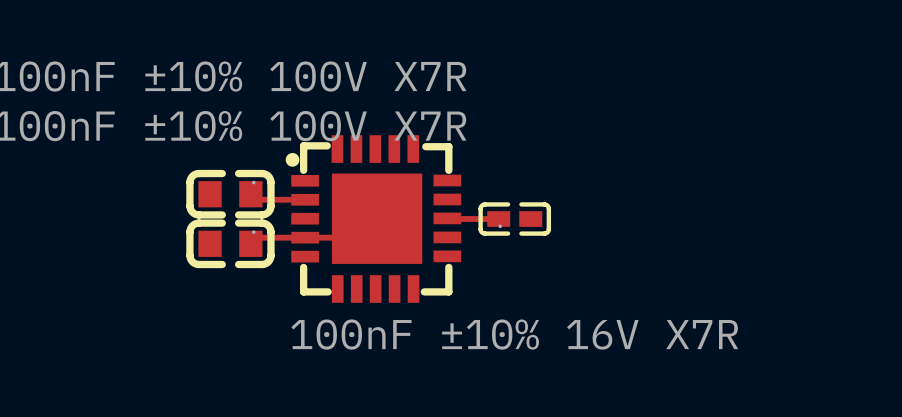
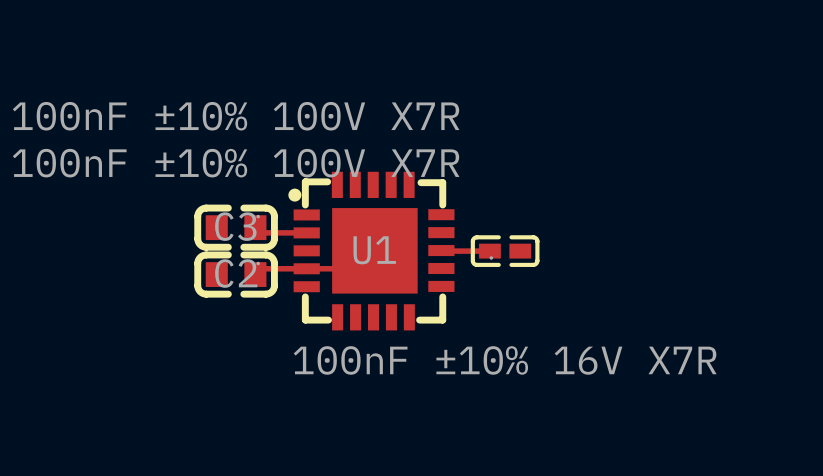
C3 name: none -> C3 (235, 226)
U1 name: none -> U1 (374, 250)
C2 name: none -> C2 (236, 273)

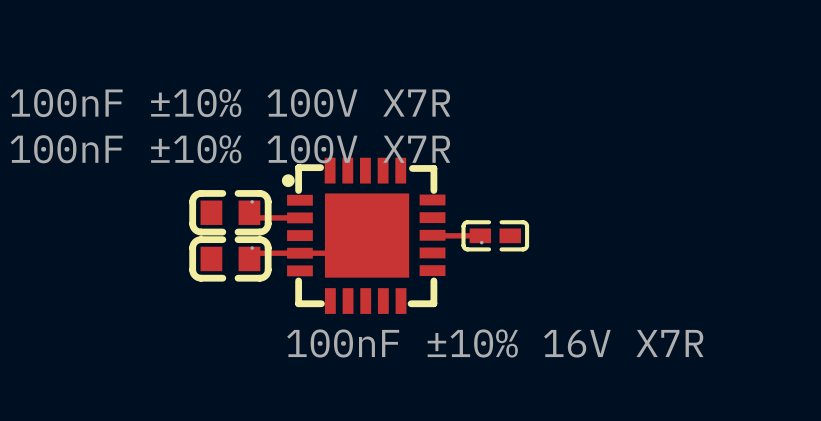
C3 name: C3 (235, 226) -> none
U1 name: U1 (374, 250) -> none
C2 name: C2 (236, 273) -> none

